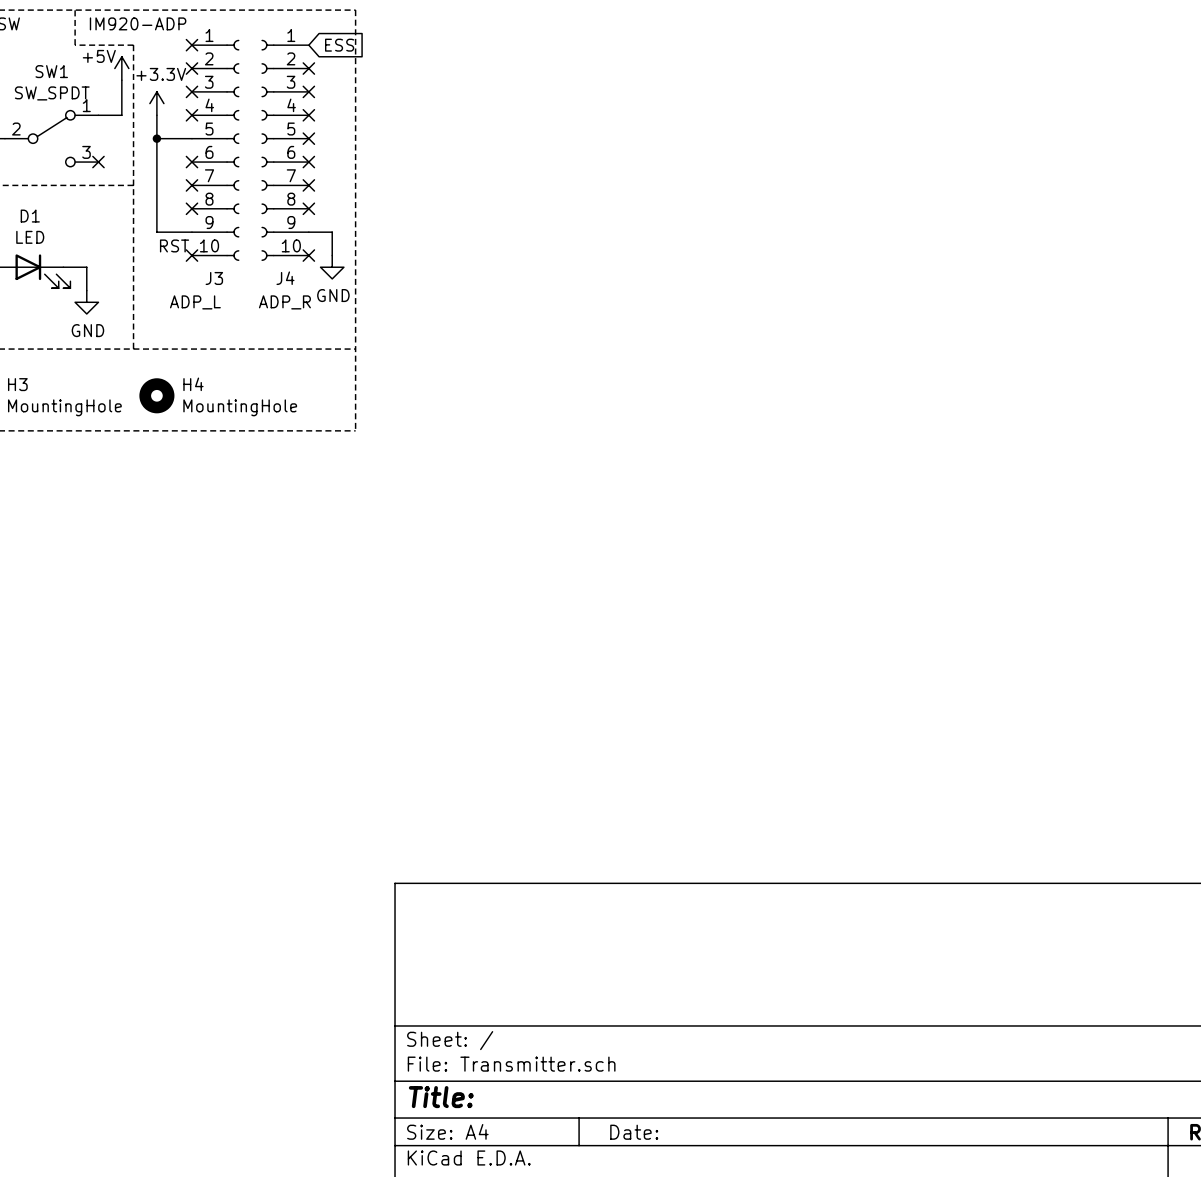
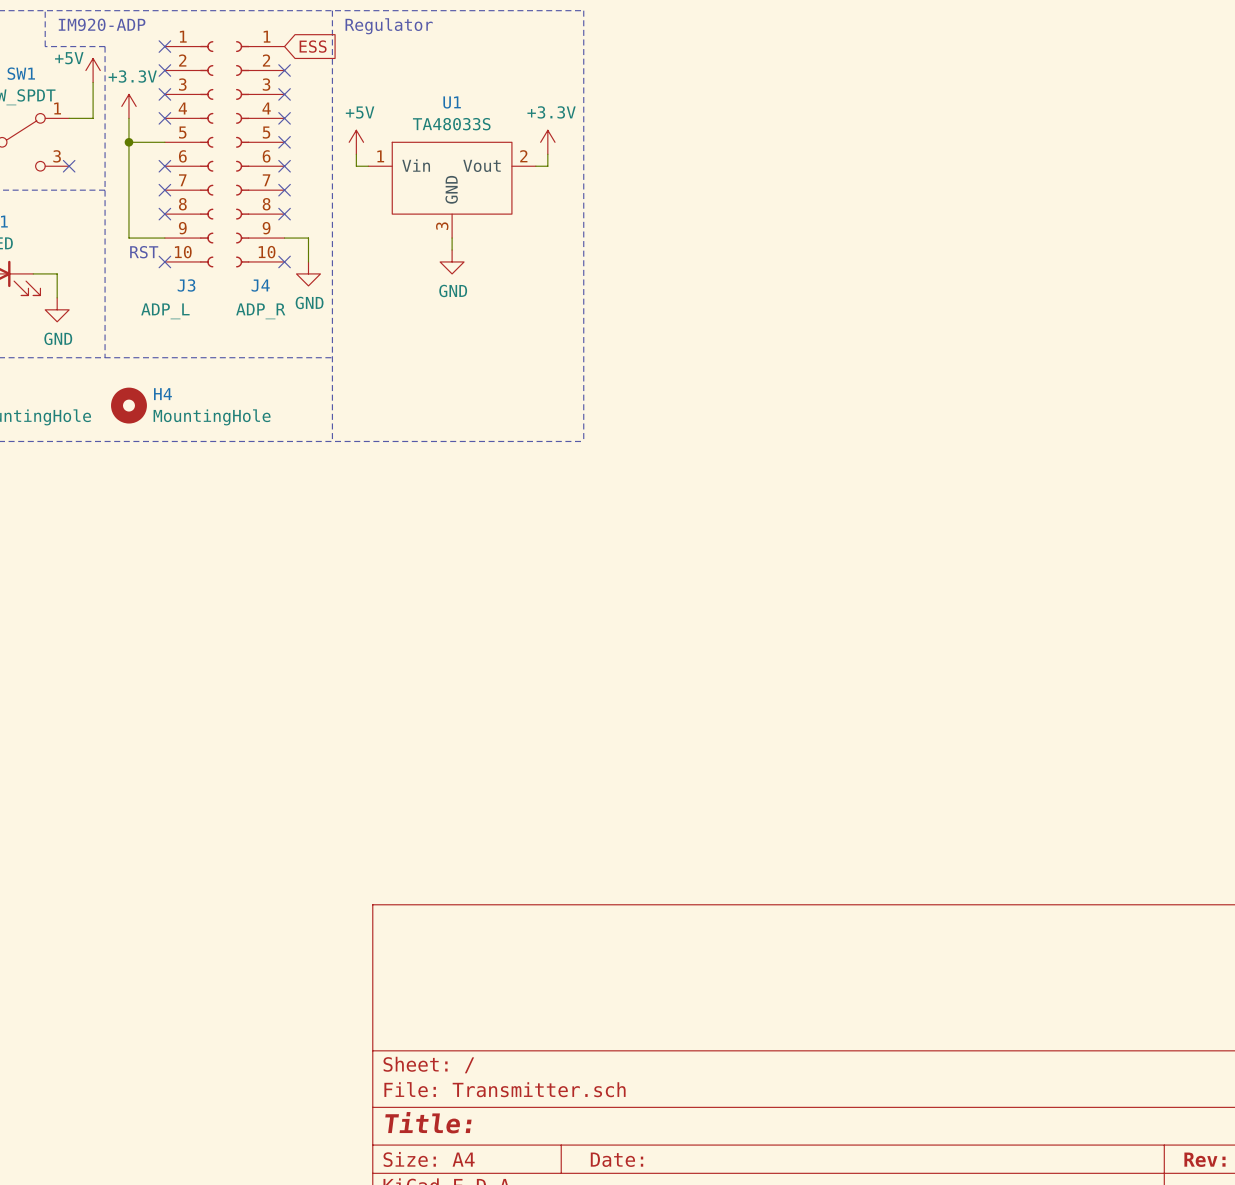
line: none -> (332, 10) (583, 10) (583, 441) (332, 441)
text: none -> Regulator (389, 26)
power symbol: none -> +5V (356, 142)
power symbol: none -> +3.3V (547, 142)
wire: none -> (356, 154) (356, 166) (368, 166)
wire: none -> (547, 154) (547, 166) (535, 166)
U1: none -> TA48033S (452, 190)
wire: none -> (452, 238) (452, 250)
power symbol: none -> GND (452, 261)

